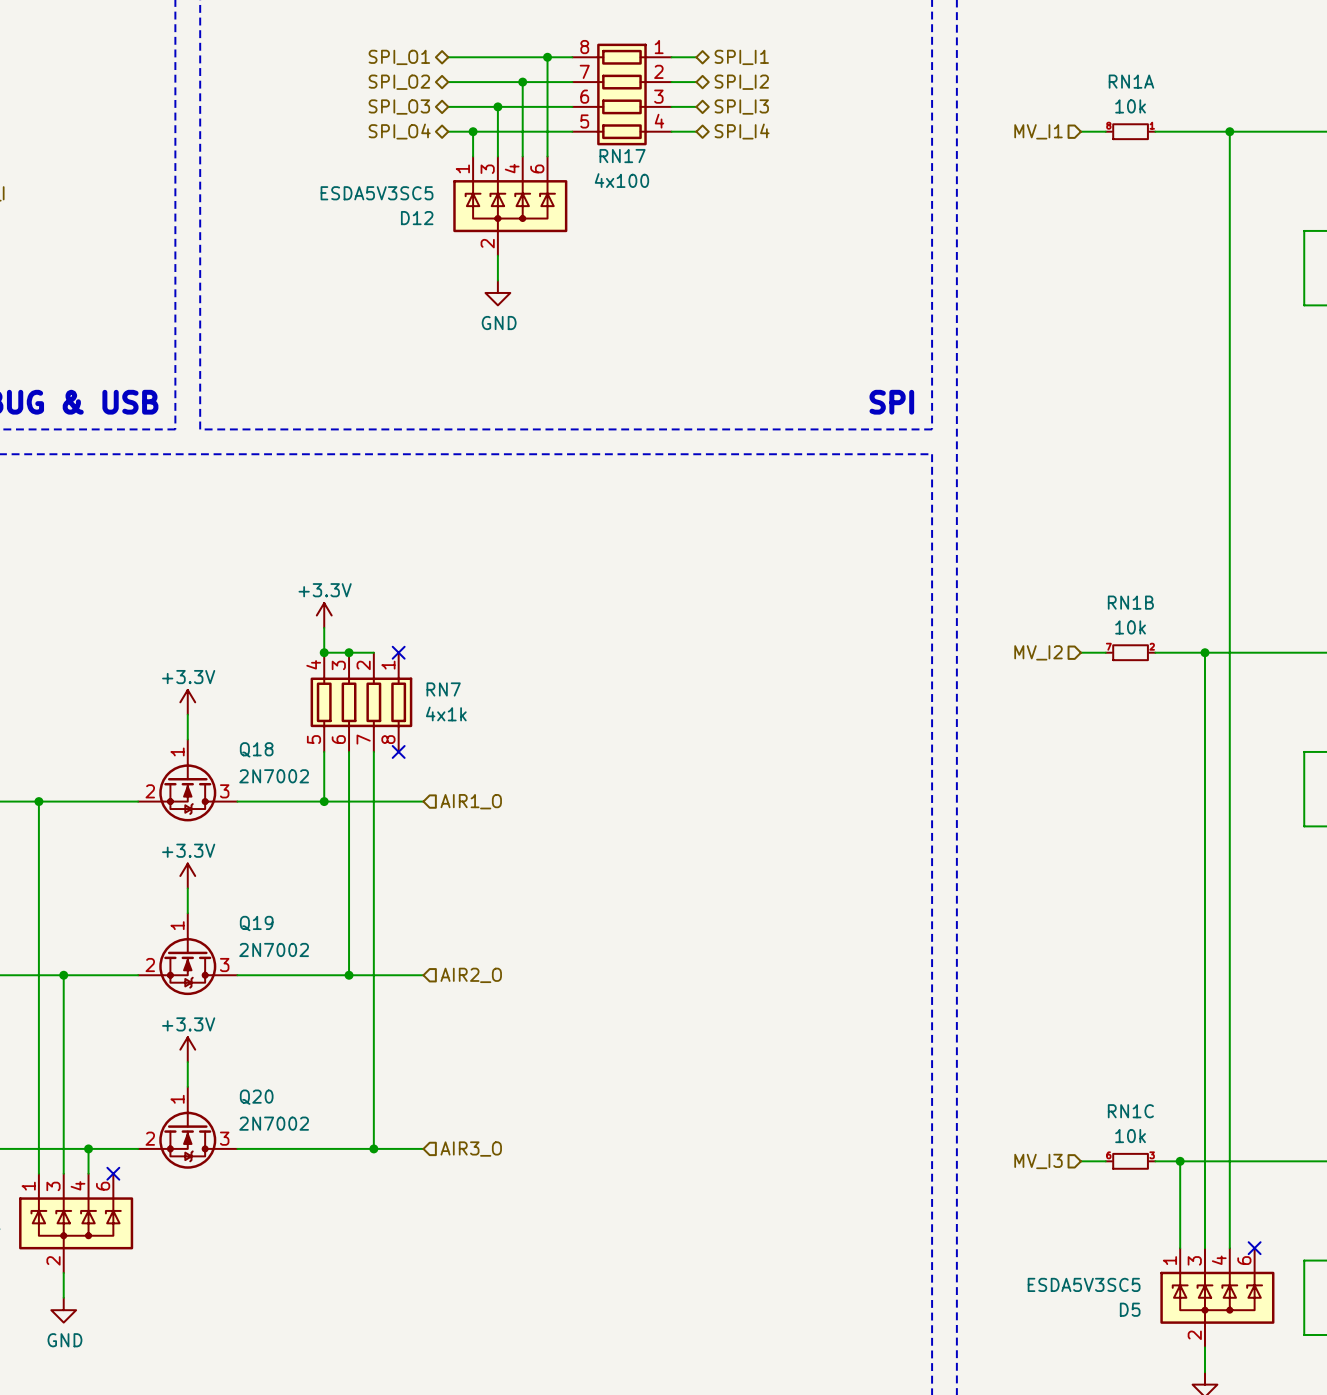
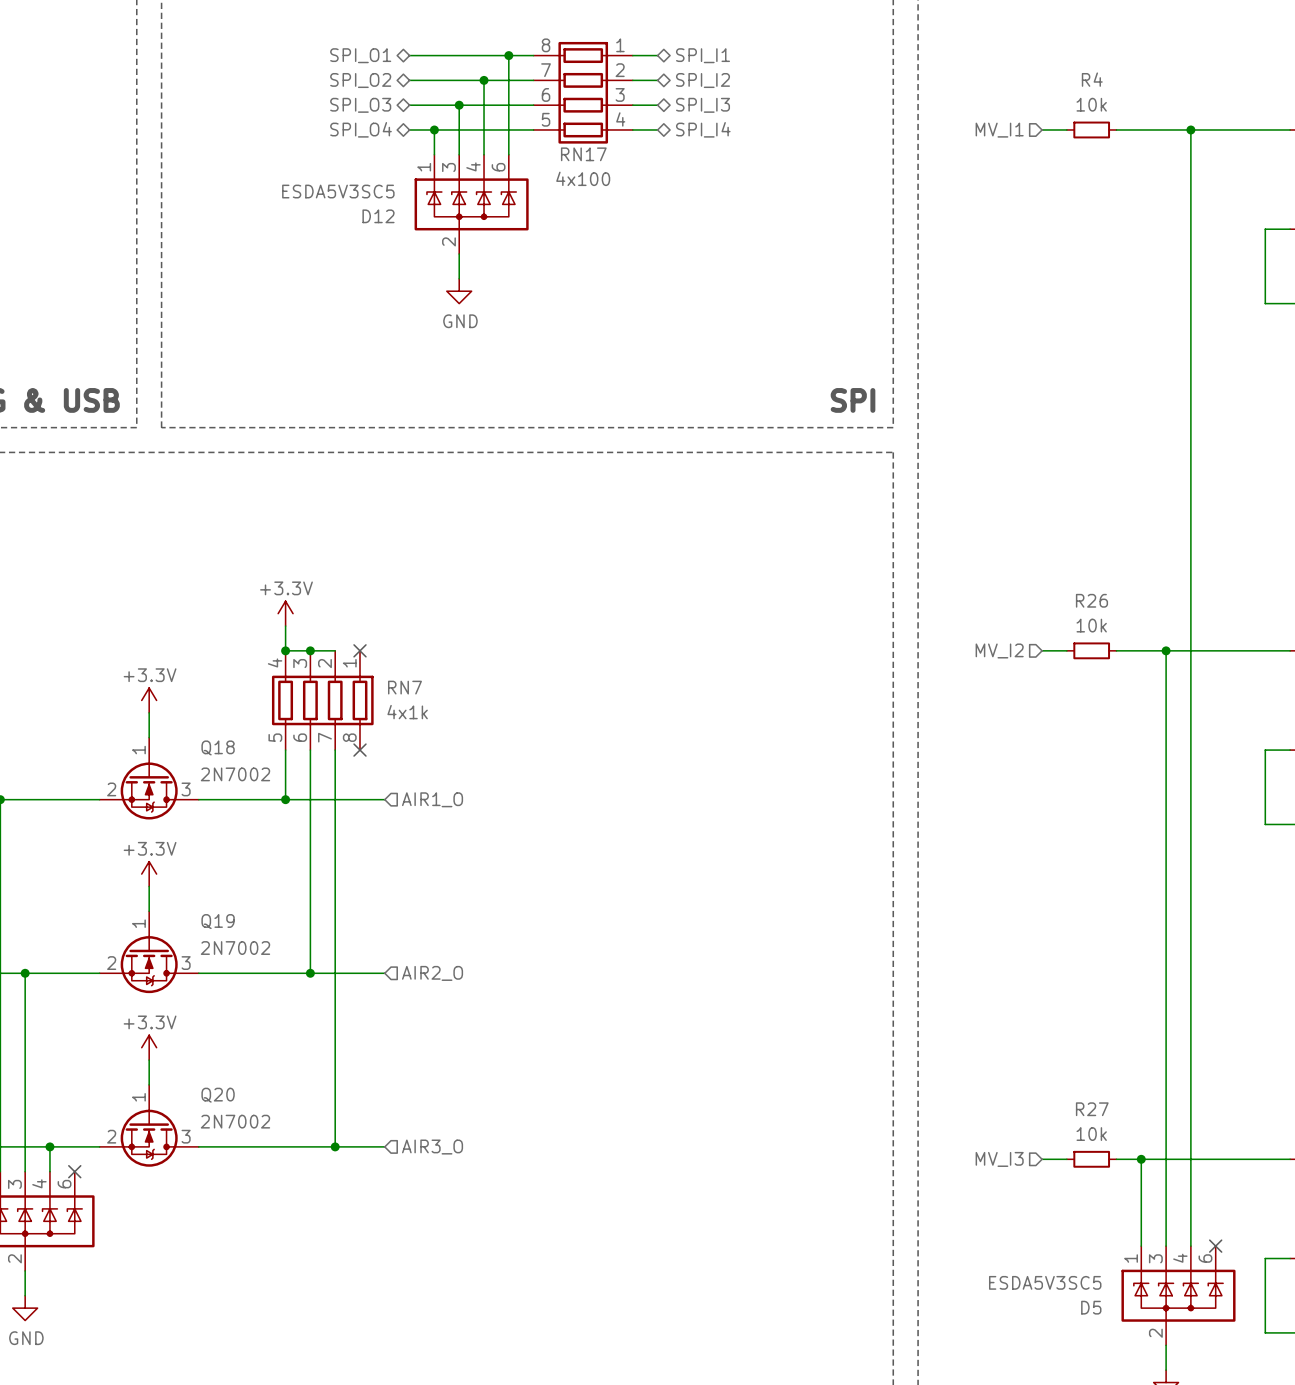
RN1A: 10k (1130, 131) -> none
R4: none -> 10k (1091, 129)
RN1B: 10k (1130, 652) -> none
R26: none -> 10k (1091, 650)
RN1C: 10k (1130, 1161) -> none
R27: none -> 10k (1091, 1159)

